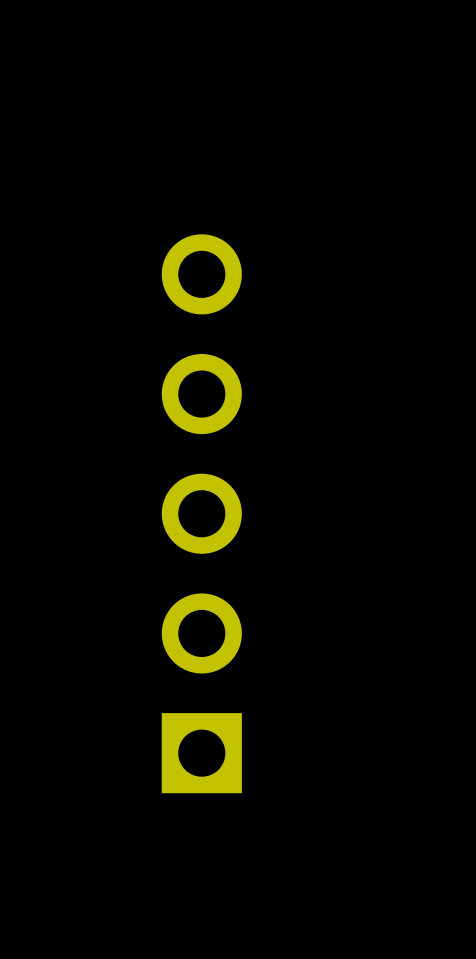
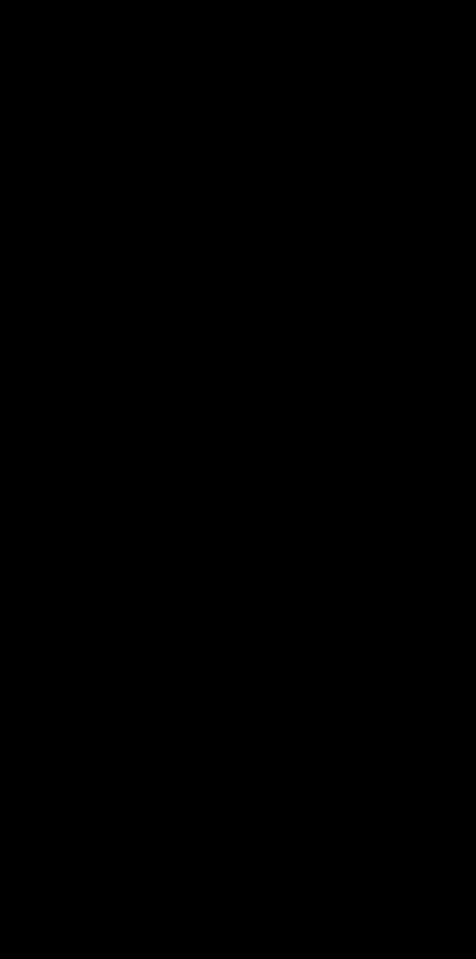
part: (201, 513) -> none

